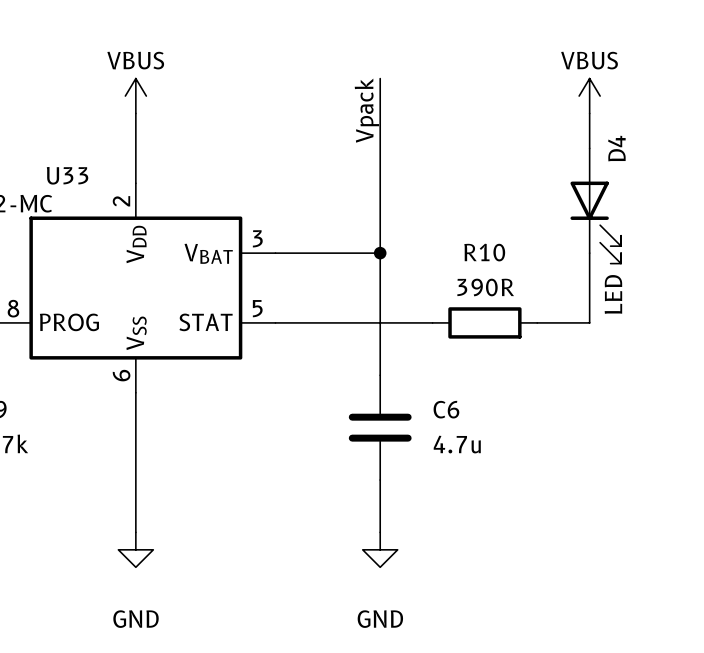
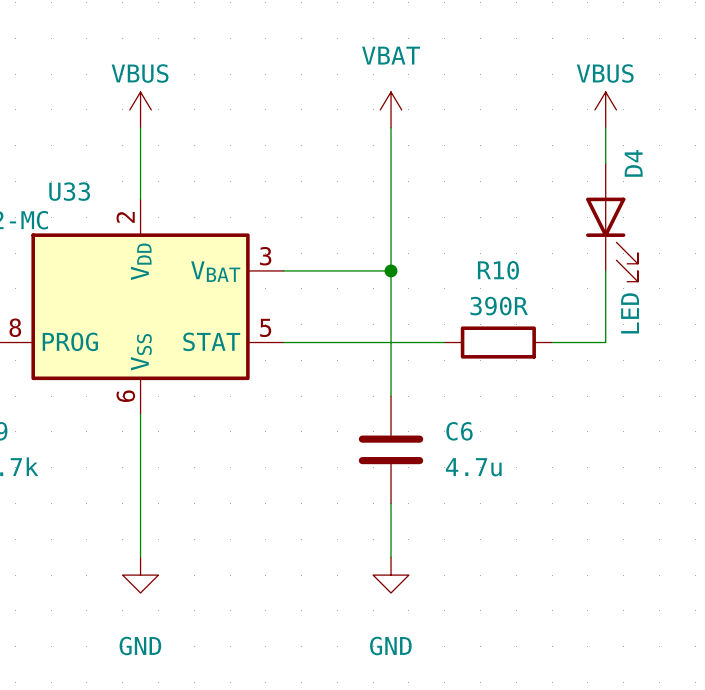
power symbol: none -> VBAT (391, 109)
label: Vpack (366, 110) -> none

